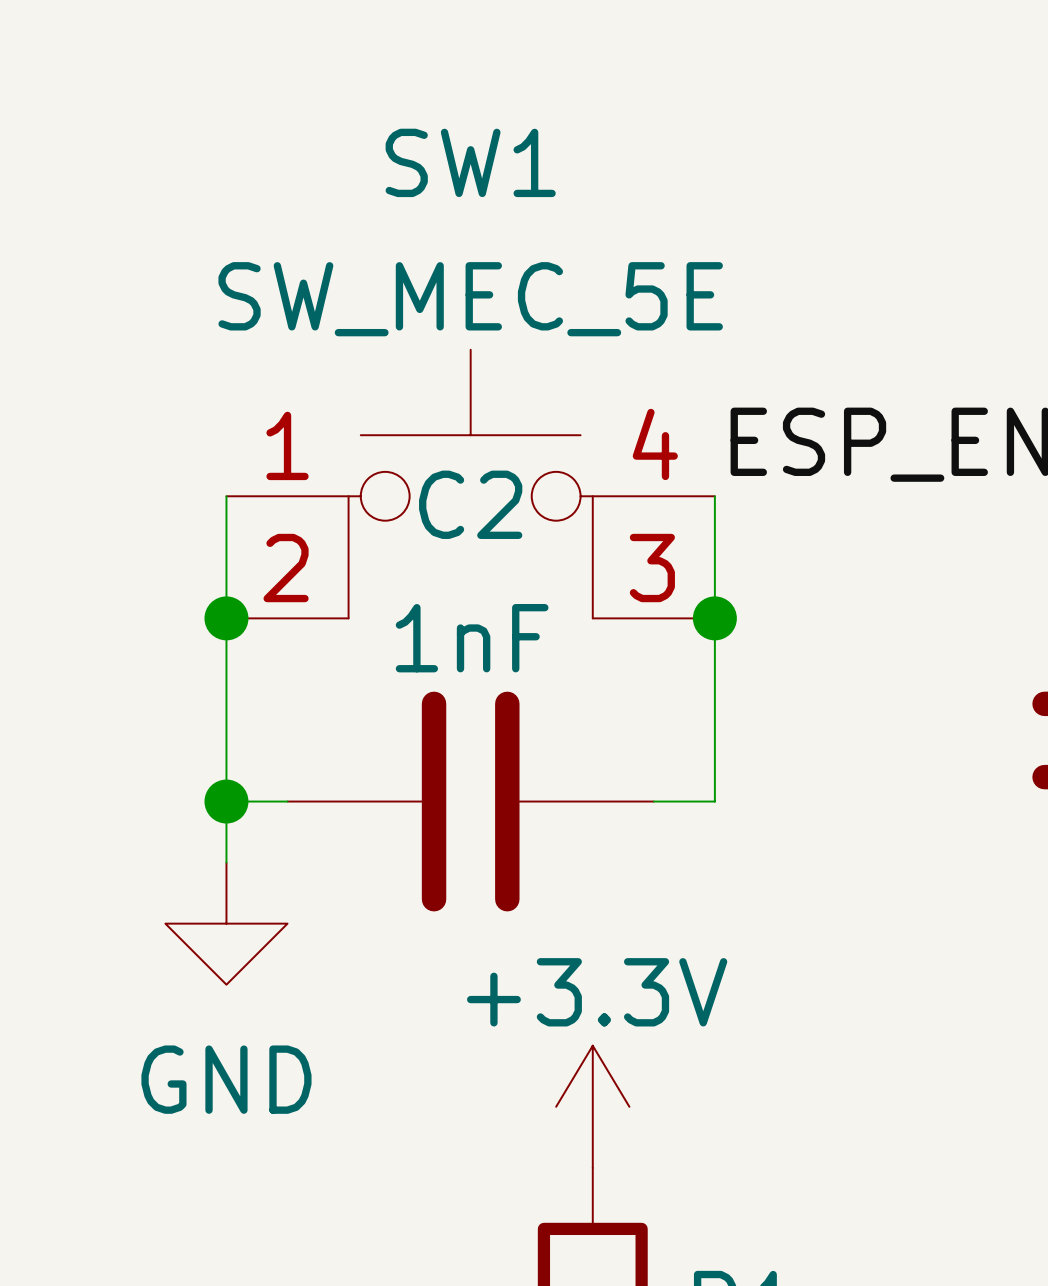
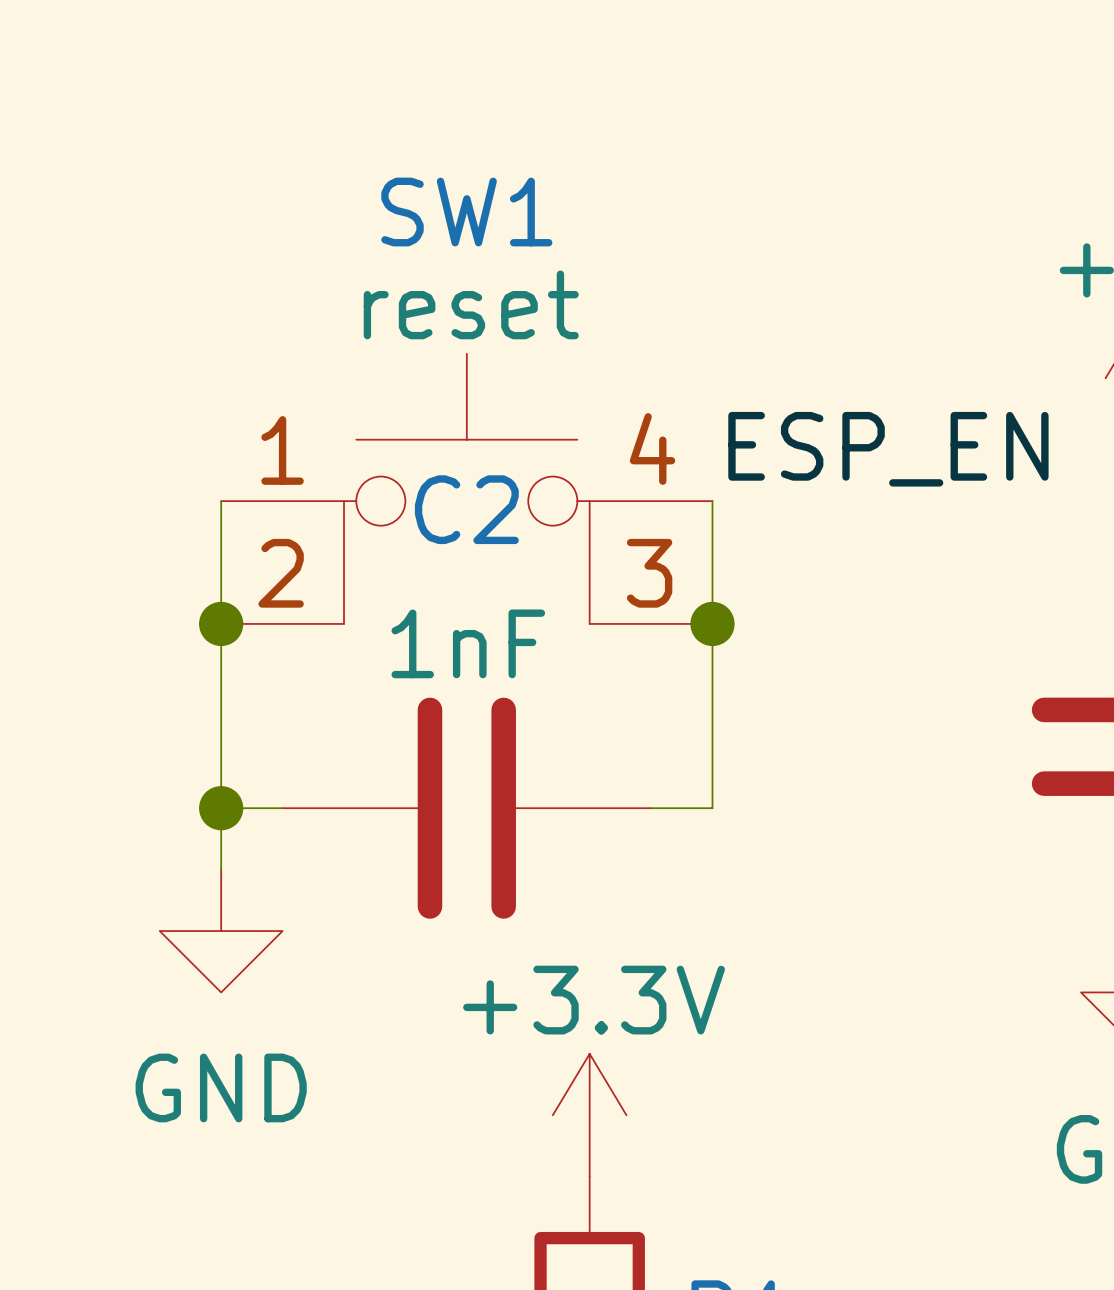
SW1 name position: SW1 (470, 162) -> SW1 (466, 212)
SW1 value: SW_MEC_5E (470, 299) -> reset (471, 304)

